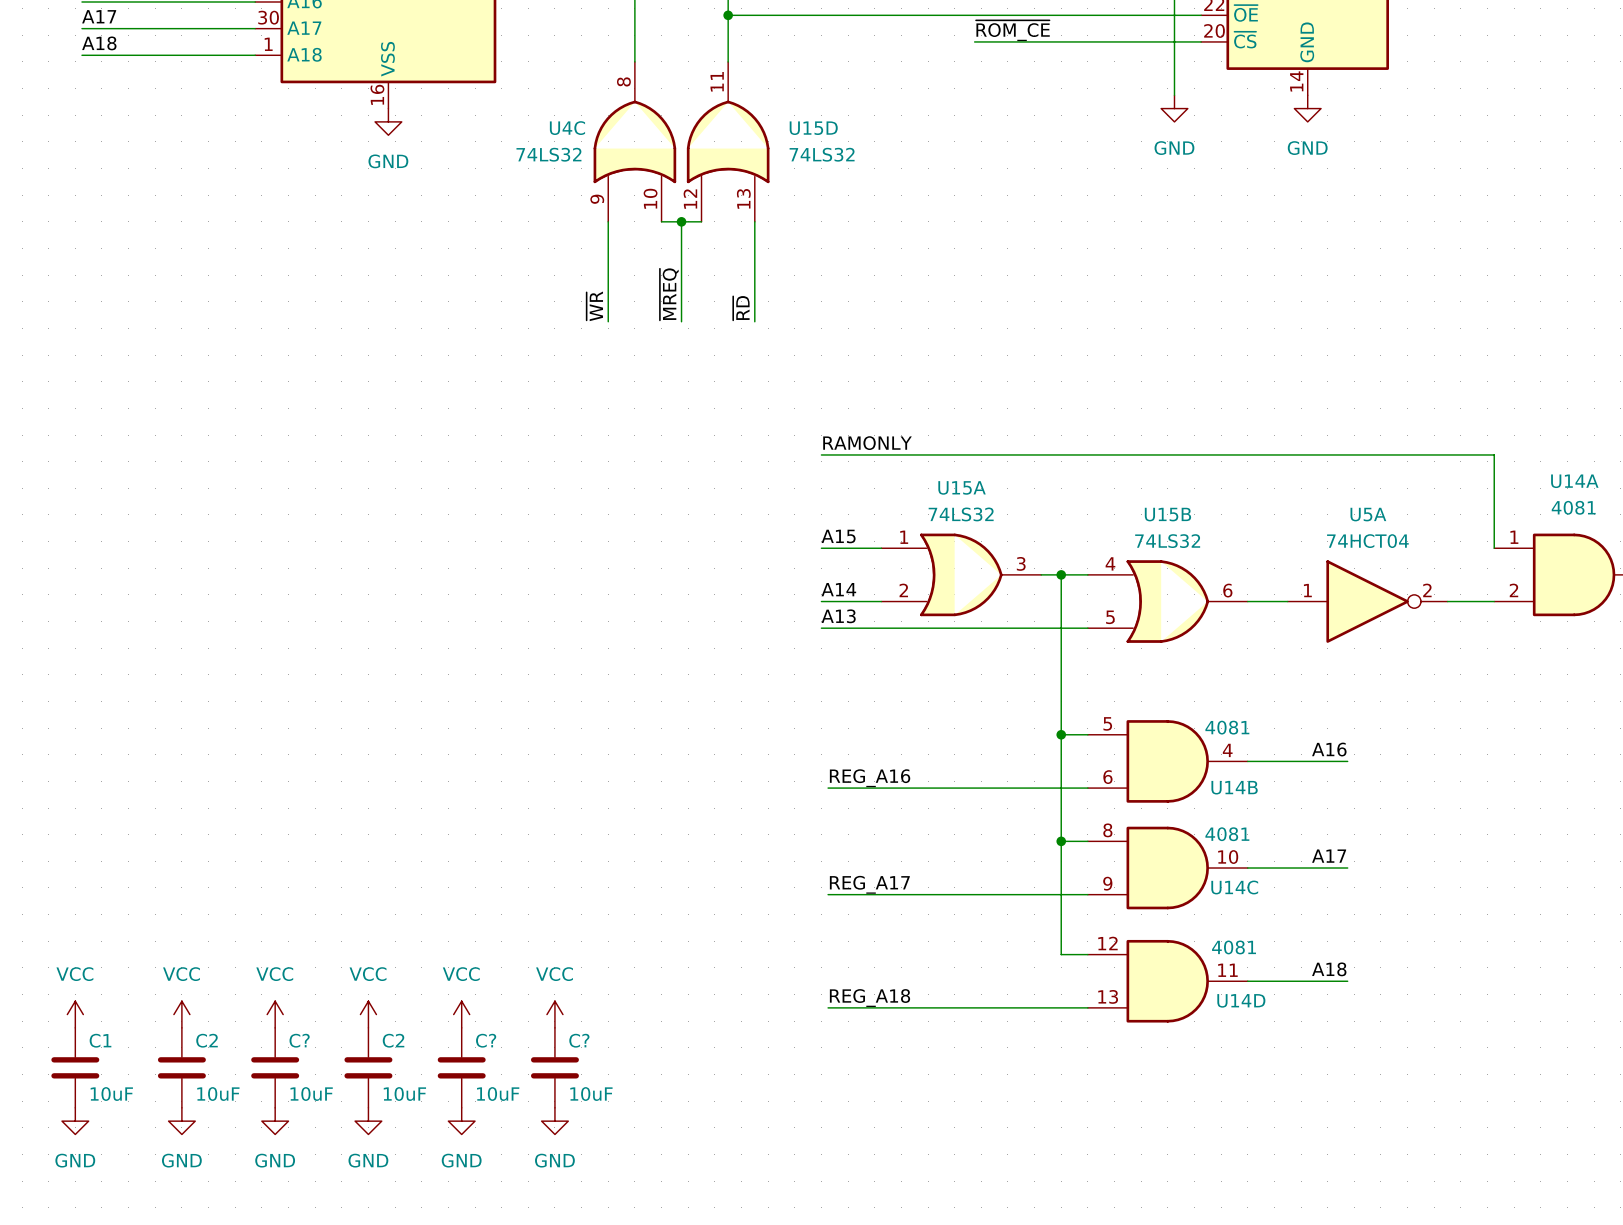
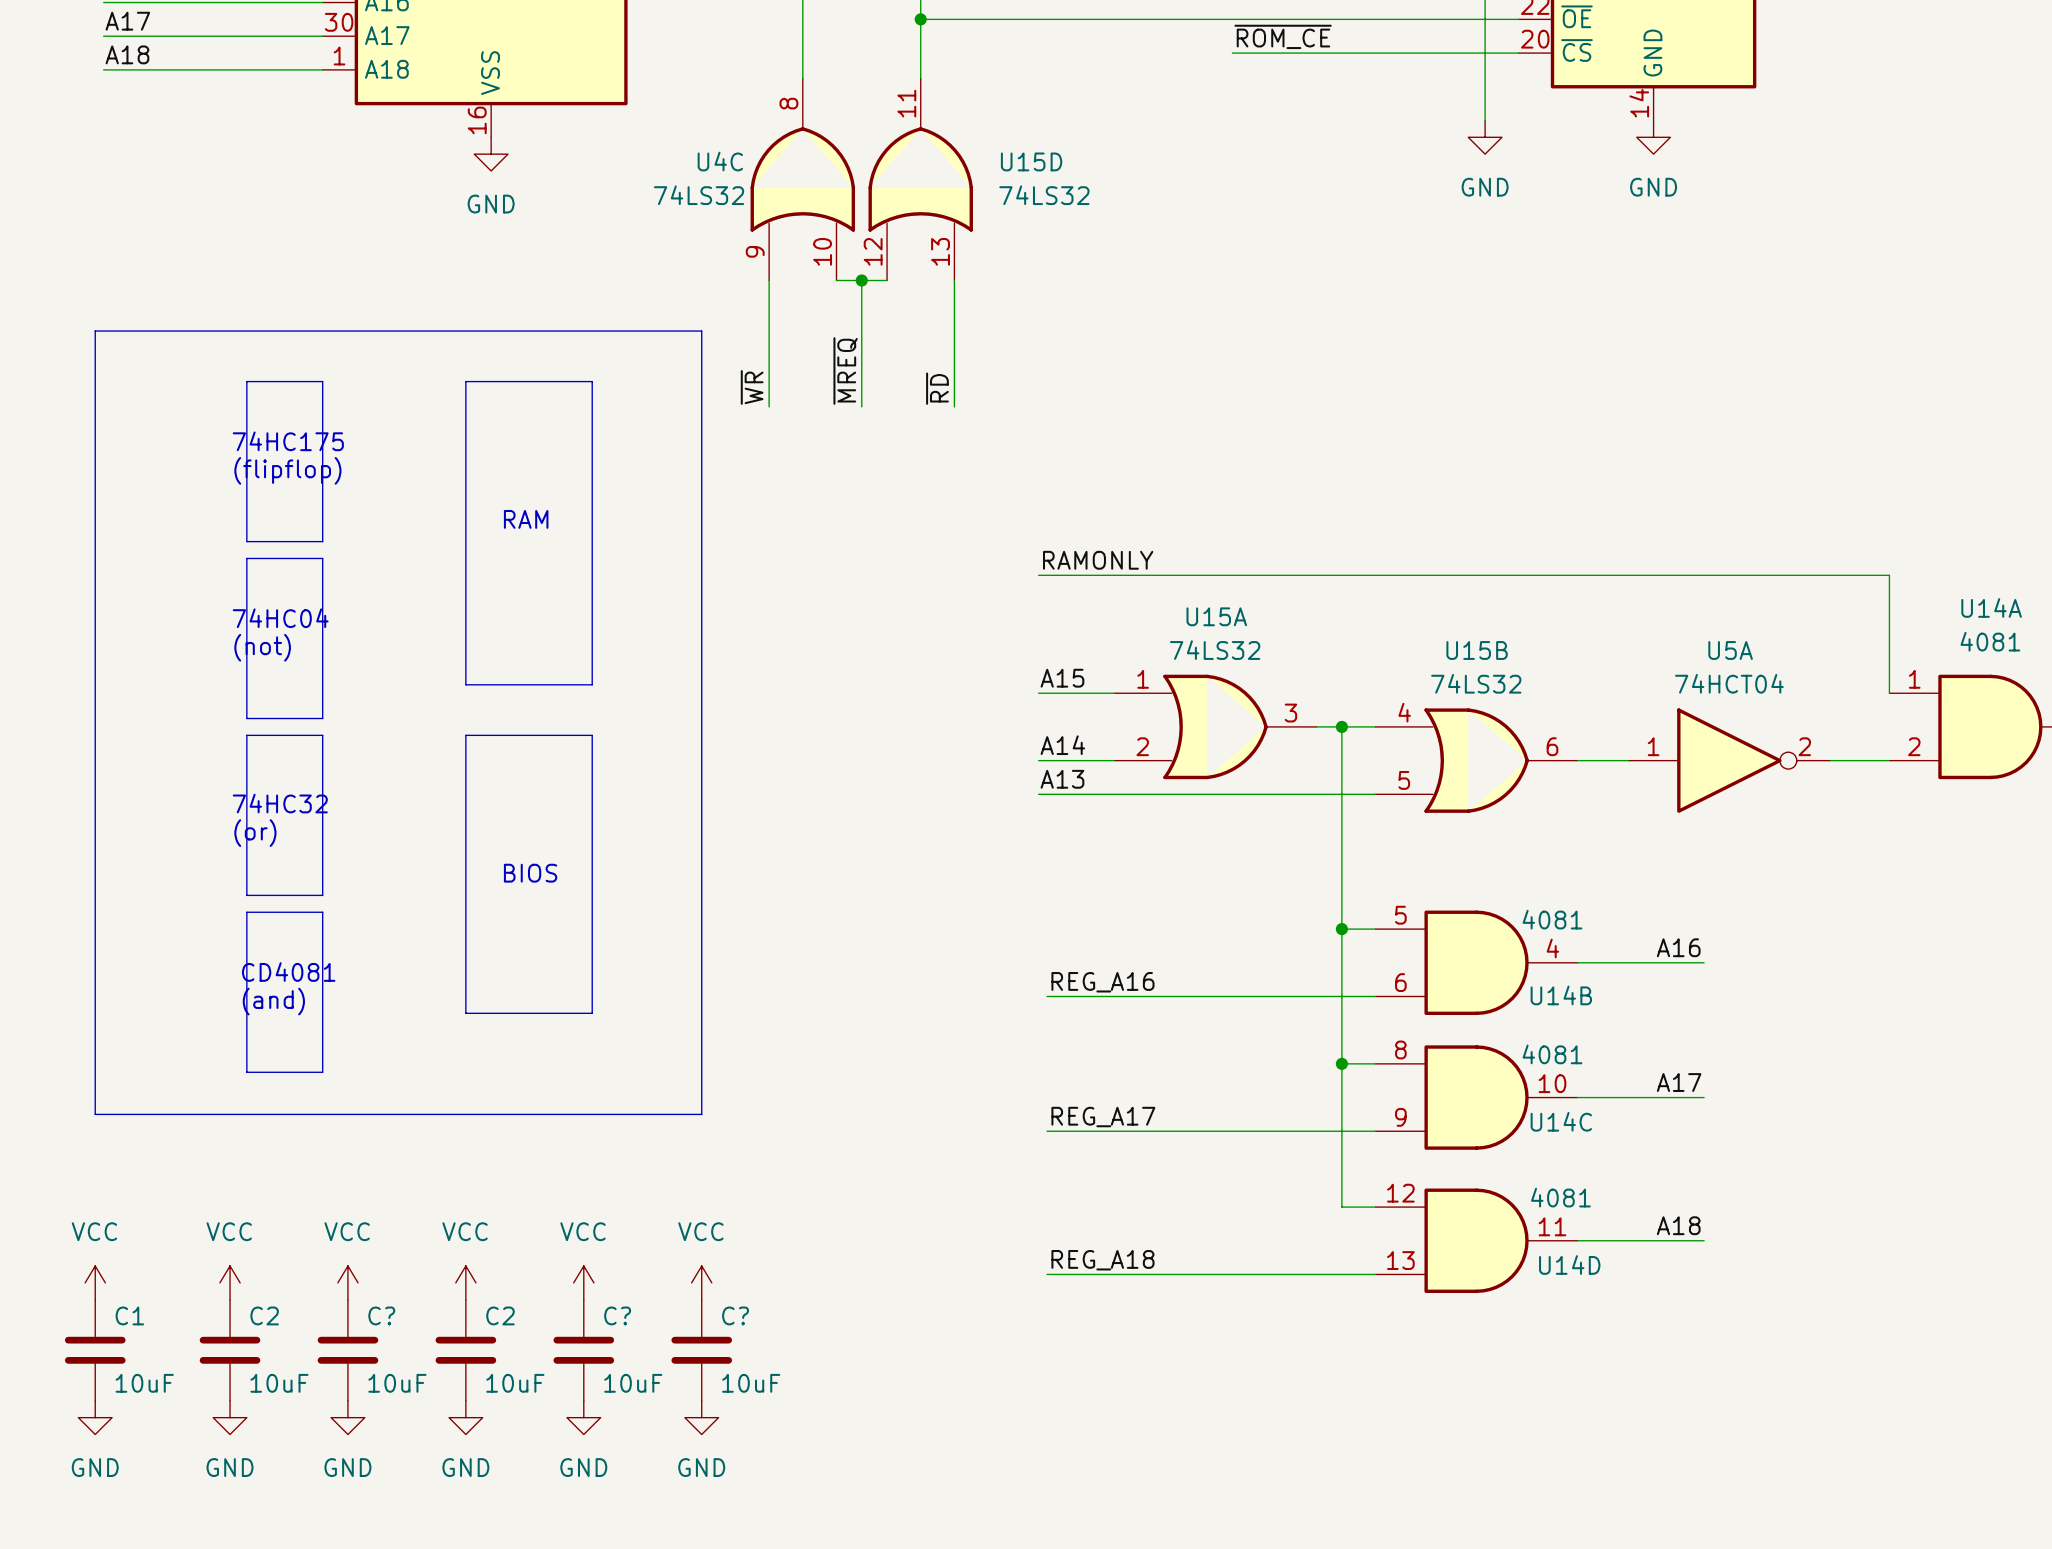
line: none -> (95, 331) (701, 331) (701, 1114) (95, 1114) (95, 331)
line: none -> (246, 381) (322, 381) (322, 541) (246, 541) (246, 381)
line: none -> (465, 381) (465, 684) (592, 684) (592, 381) (465, 381)
text: none -> 74HC175 (288, 441)
text: none -> (flipflop) (287, 470)
text: none -> RAM (526, 519)
line: none -> (246, 558) (246, 718) (322, 718) (322, 558) (246, 558)
text: none -> 74HC04 (280, 618)
text: none -> (not) (262, 647)
line: none -> (246, 735) (322, 735) (322, 895) (246, 895) (246, 735)
line: none -> (465, 735) (592, 735) (592, 1013) (465, 1013) (465, 735)
text: none -> 74HC32 (280, 803)
text: none -> (or) (255, 833)
text: none -> BIOS (530, 873)
line: none -> (246, 912) (322, 912) (322, 1072) (246, 1072) (246, 912)
text: none -> CD4081 (288, 972)
text: none -> (and) (273, 1001)

